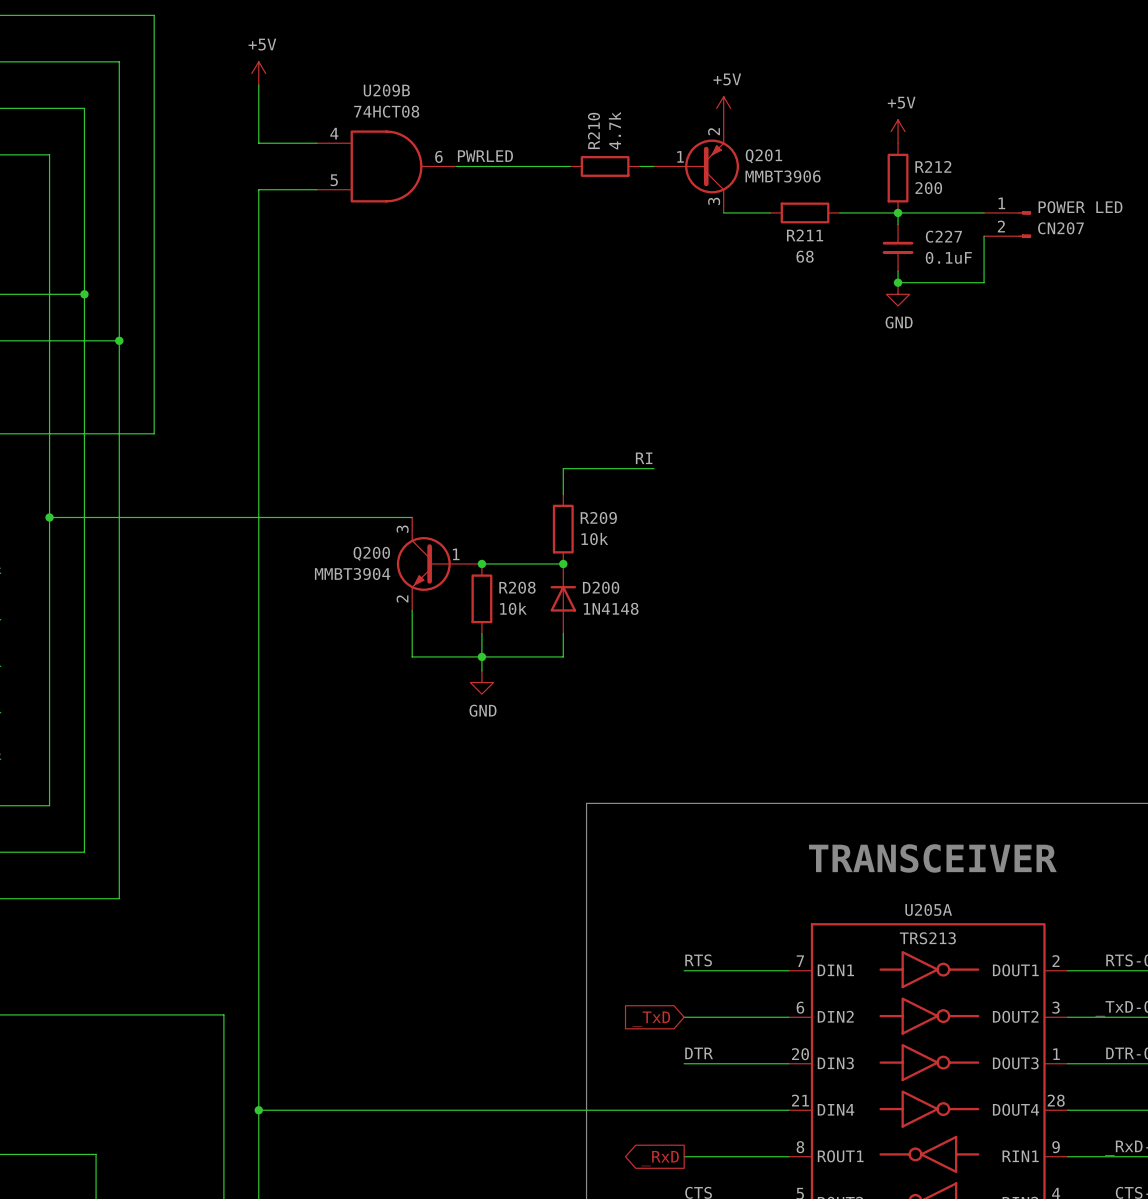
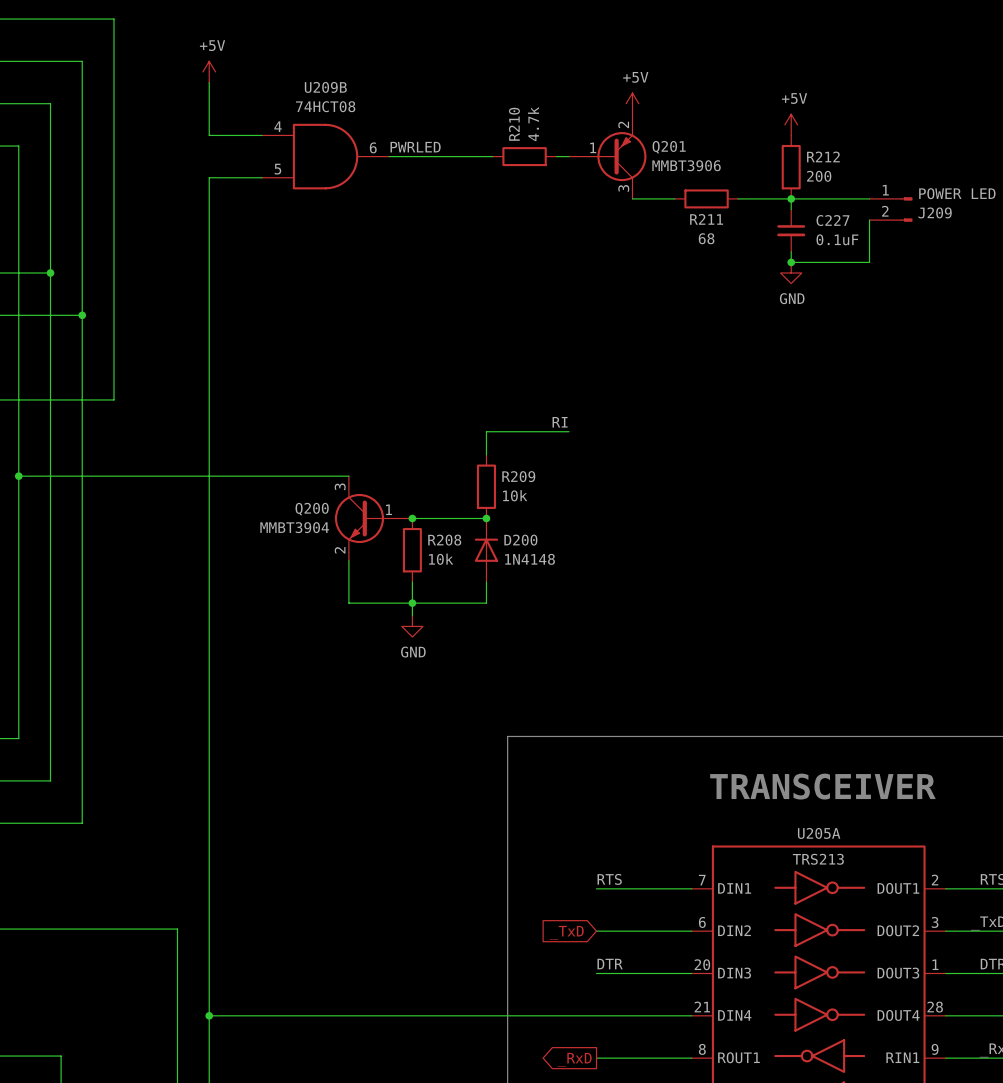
CN207 name: CN207 (1060, 228) -> J209 (935, 212)

